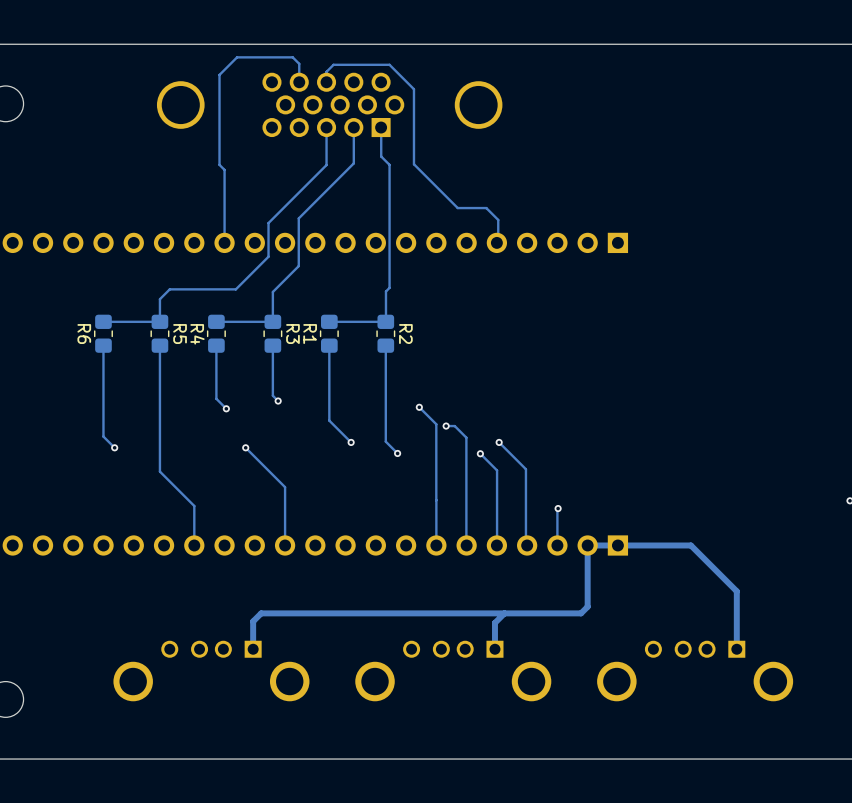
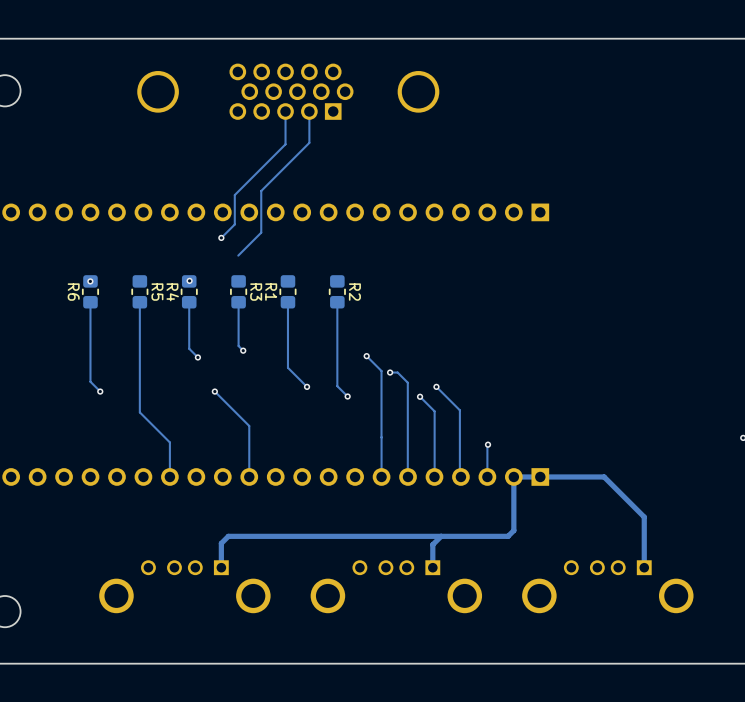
track: (299, 82) (299, 63) (292, 57) (237, 57) (219, 74) (219, 164) (224, 169) (224, 242) -> none
track: (326, 82) (326, 71) (333, 64) (389, 64) (413, 89) (413, 164) (457, 208) (486, 208) (498, 219) (496, 242) -> none
track: (381, 127) (381, 156) (389, 164) (389, 287) (385, 291) (385, 321) (329, 321) -> none
track: (253, 272) (235, 289) (169, 289) (159, 299) (159, 321) (103, 321) -> none
via: none -> (221, 237)
track: (272, 291) (272, 321) (216, 321) -> (238, 255) (238, 255)
via: none -> (90, 281)
via: none -> (189, 280)

